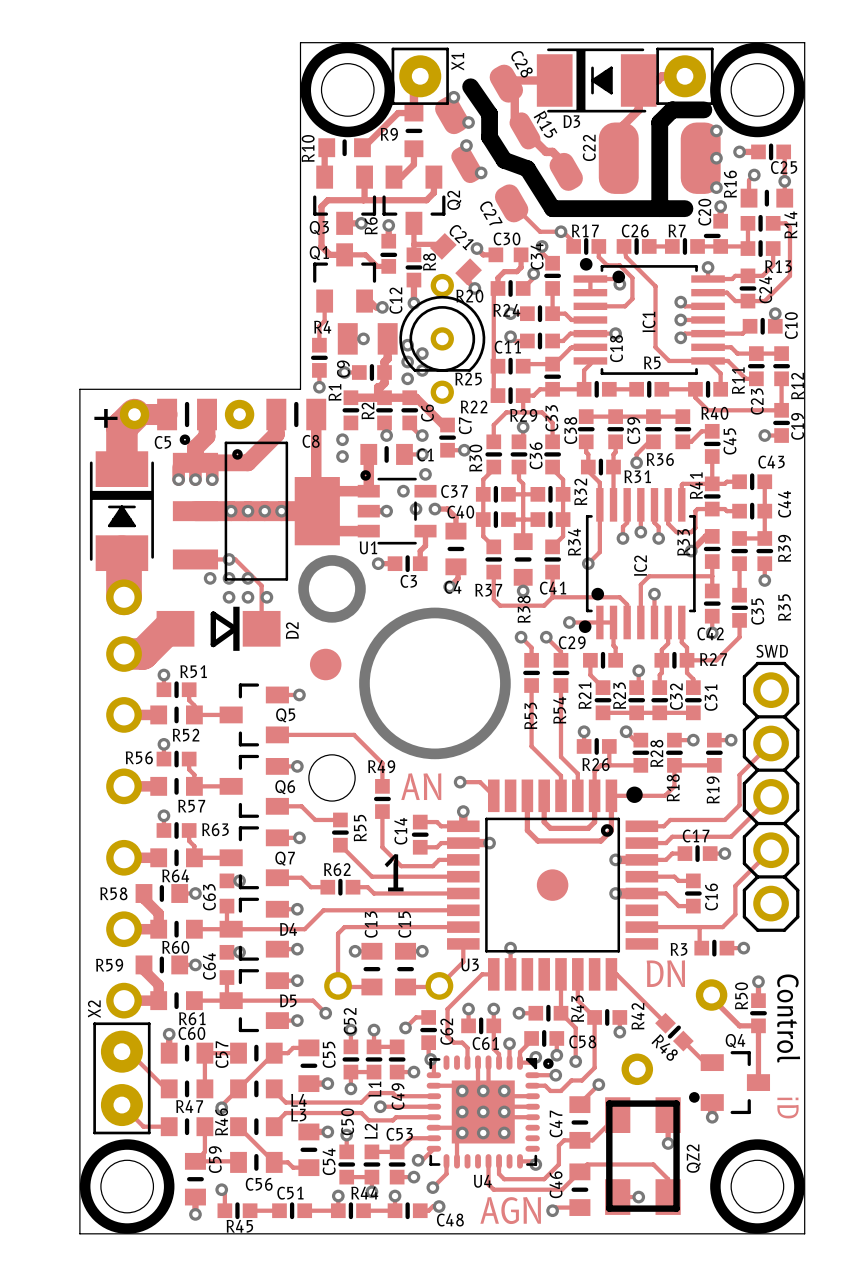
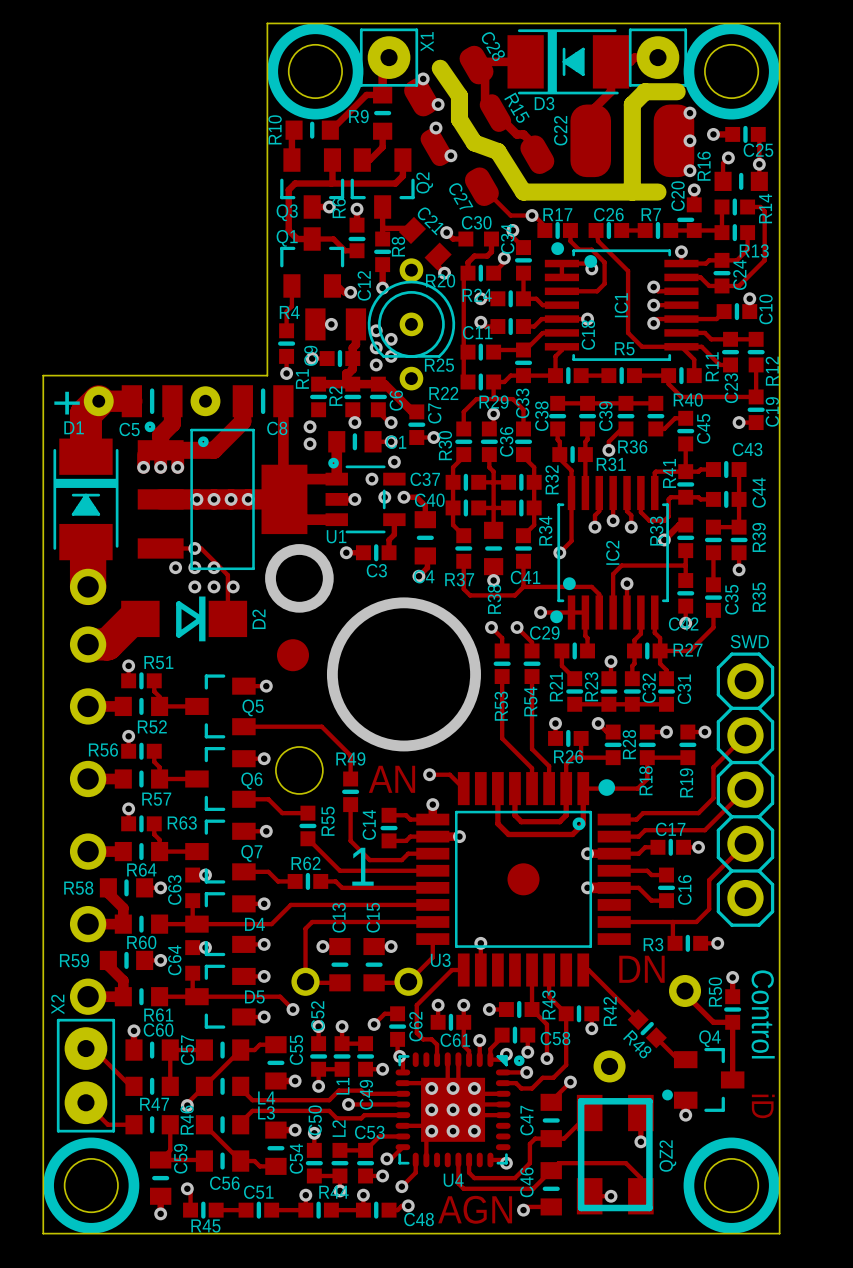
D1 name: none -> D1 (74, 427)

